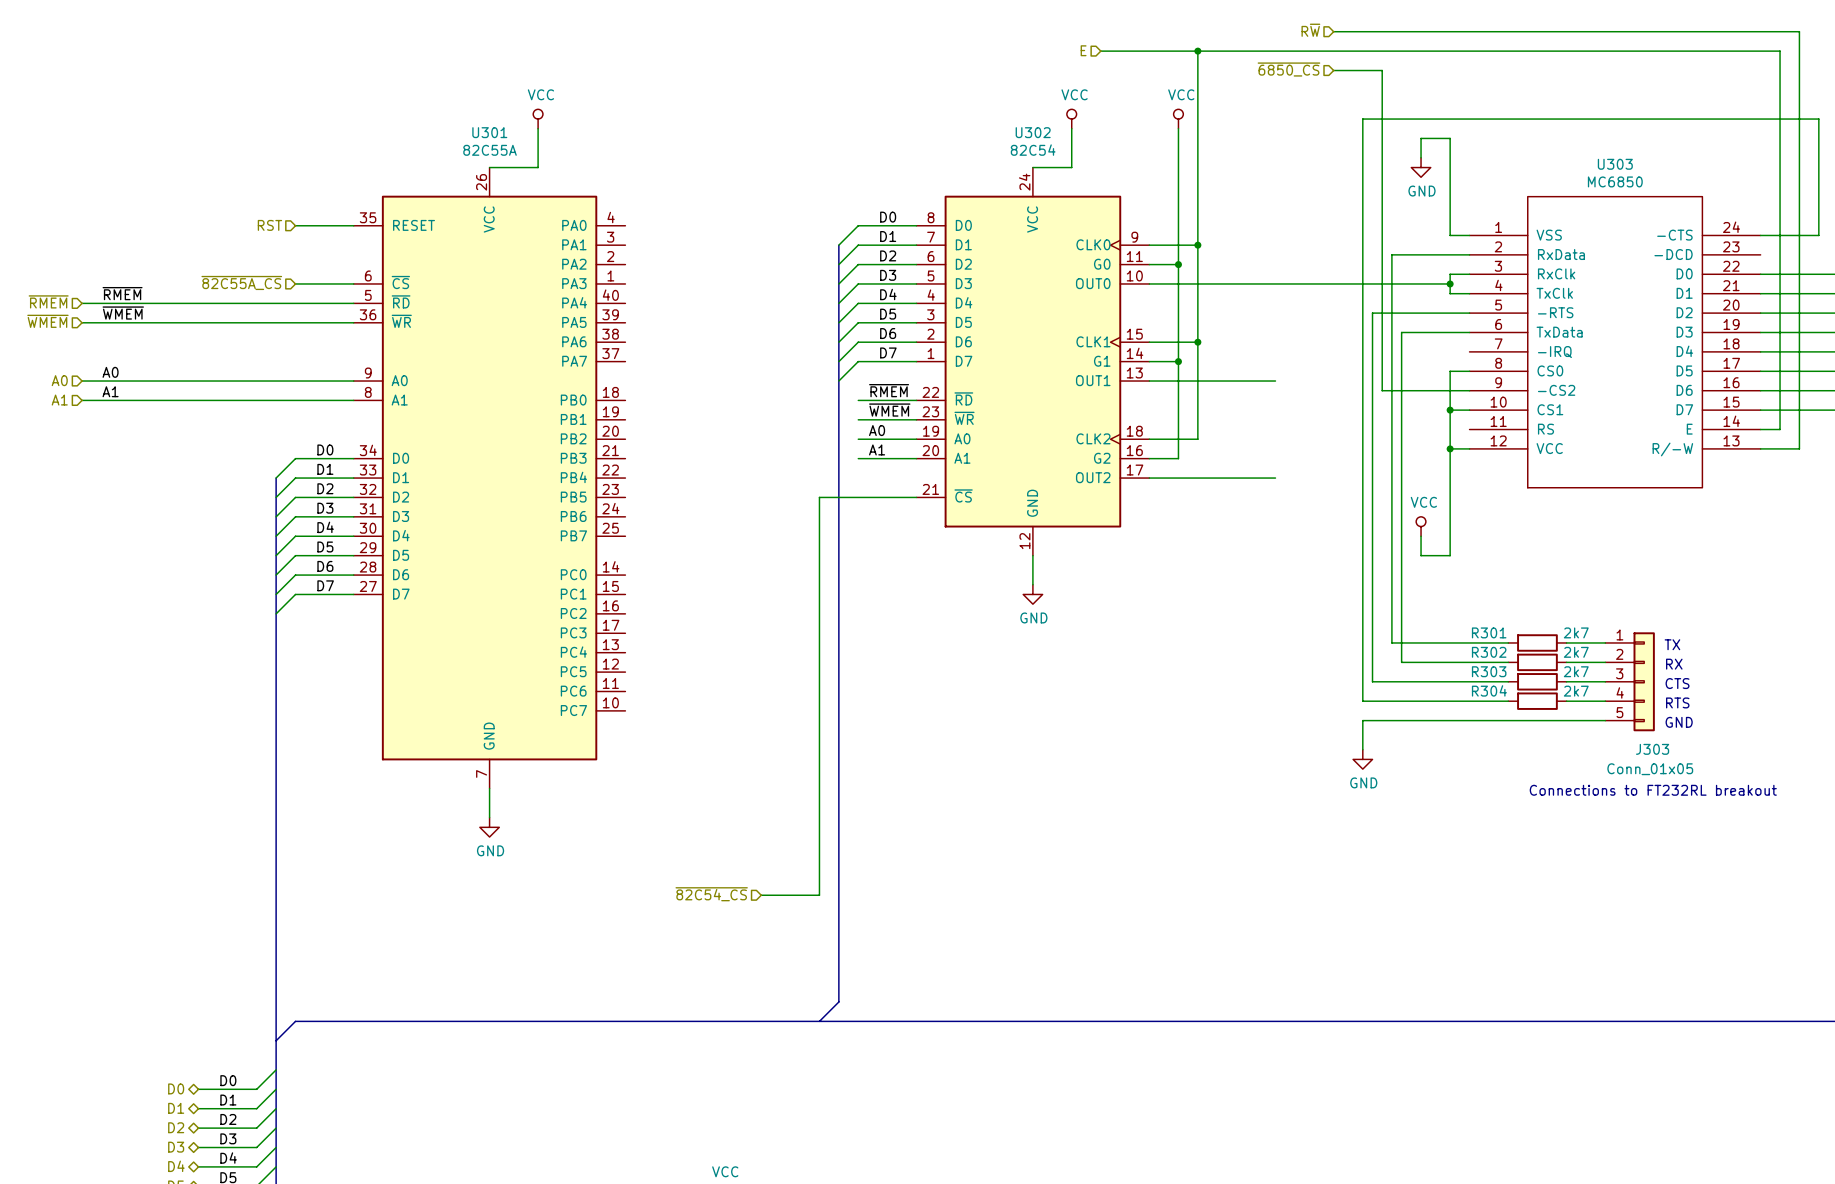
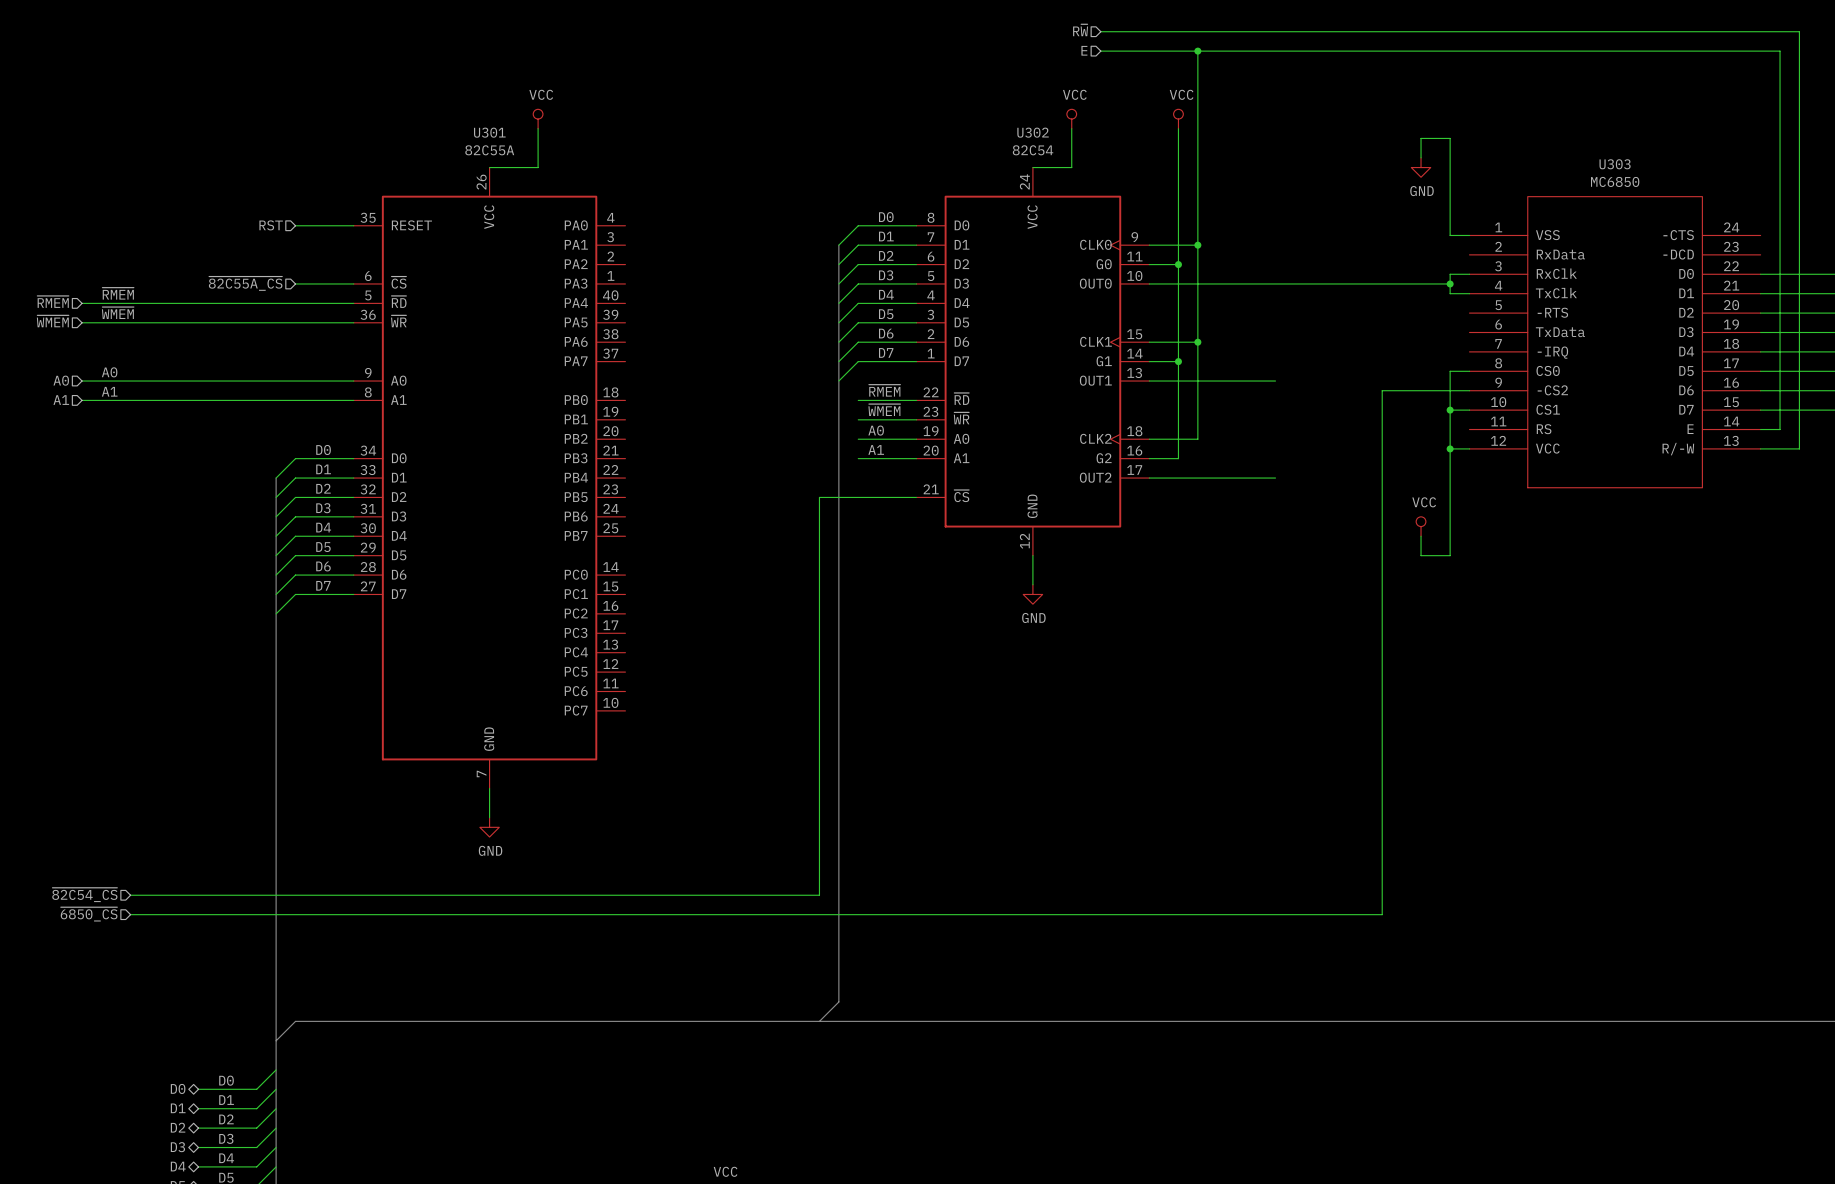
hierarchical label: none -> R~{W} (1080, 30)
hierarchical label: R~{W} (1310, 30) -> none
wire: none -> (1100, 31) (1333, 31)
hierarchical label: ~{6850_CS} (1288, 69) -> none
wire: (1333, 70) (1382, 70) (1382, 390) -> (130, 914) (1382, 914) (1382, 390)
wire: (1760, 235) (1818, 235) (1818, 119) (1362, 119) (1362, 701) (1508, 701) -> none
wire: (1469, 254) (1391, 254) (1391, 642) (1508, 642) -> none
wire: (1469, 313) (1372, 313) (1372, 681) (1508, 681) -> none
wire: (1469, 332) (1401, 332) (1401, 662) (1508, 662) -> none
R301: 2k7 (1537, 642) -> none
wire: (1566, 642) (1605, 642) -> none
text: TX (1672, 644) -> none
R302: 2k7 (1537, 662) -> none
wire: (1566, 662) (1605, 662) -> none
text: RX (1674, 664) -> none
R303: 2k7 (1537, 681) -> none
wire: (1566, 681) (1605, 681) -> none
J303: Conn_01x05 (1630, 681) -> none
text: CTS (1677, 683) -> none
R304: 2k7 (1537, 701) -> none
wire: (1566, 701) (1605, 701) -> none
text: RTS (1677, 702) -> none
wire: (1605, 720) (1362, 720) (1362, 749) -> none
text: GND (1679, 722) -> none
power symbol: GND (1362, 759) -> none
text: Connections to FT232RL breakout (1653, 790) -> none
hierarchical label: none -> ~{82C54_CS} (84, 894)
hierarchical label: ~{82C54_CS} (711, 894) -> none
wire: none -> (130, 895) (761, 895)
hierarchical label: none -> ~{6850_CS} (89, 914)

